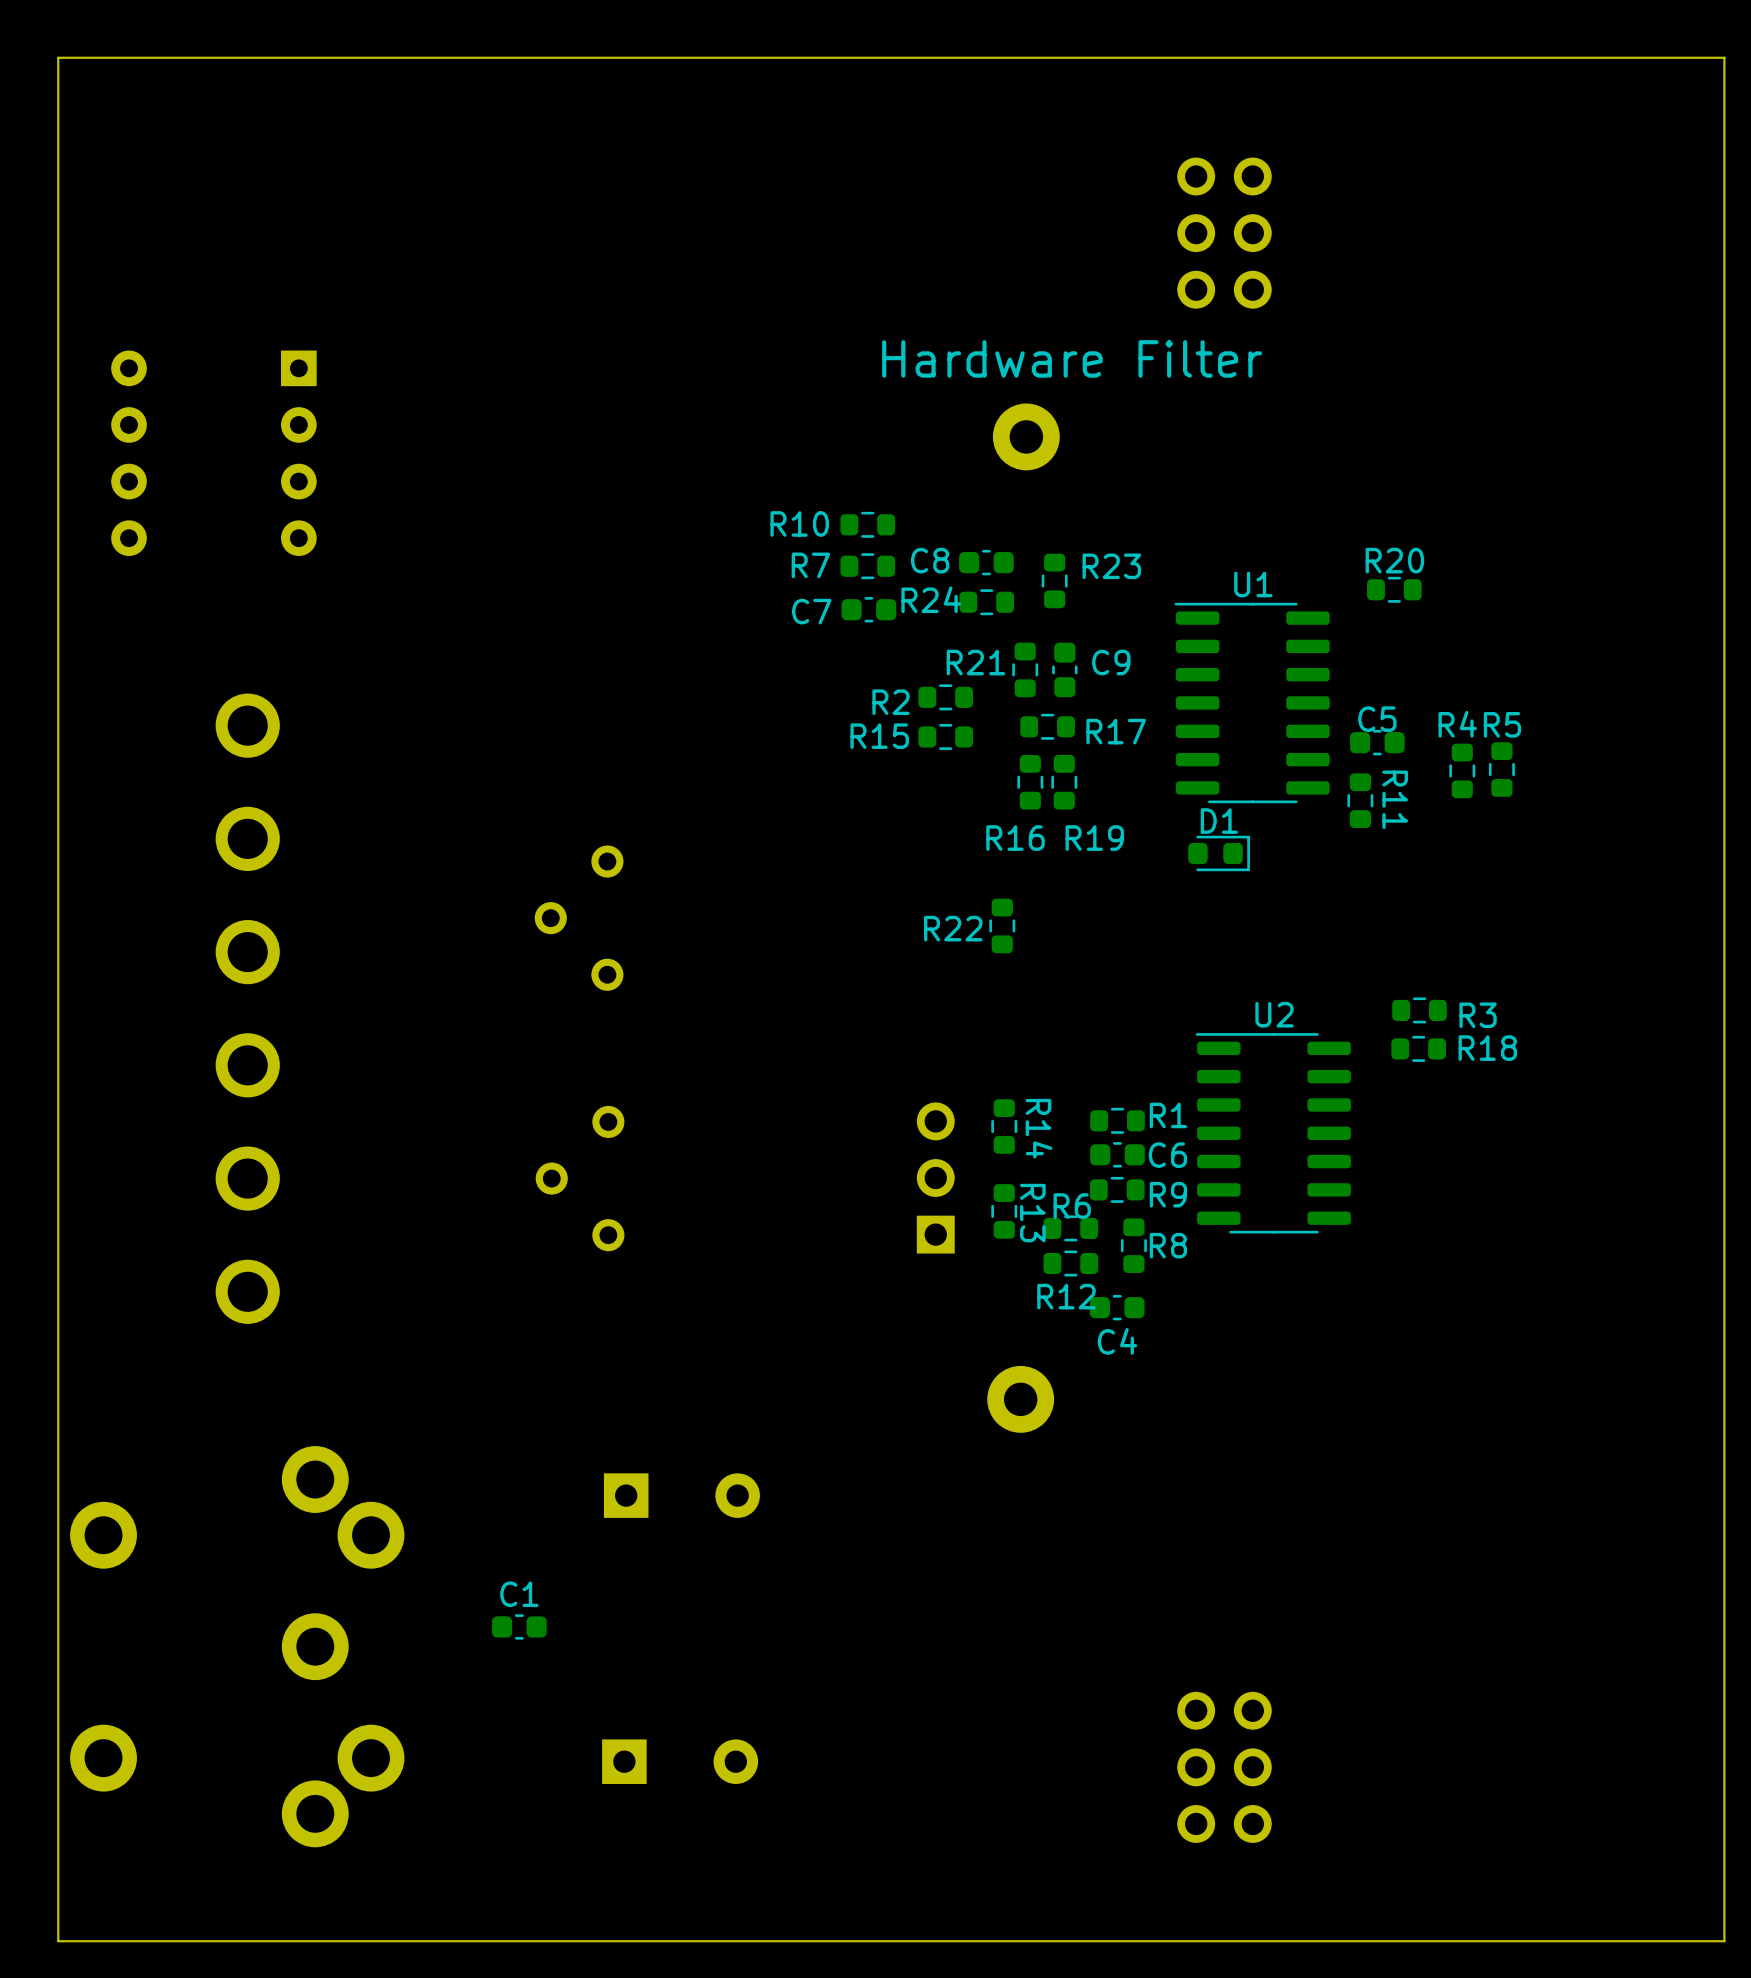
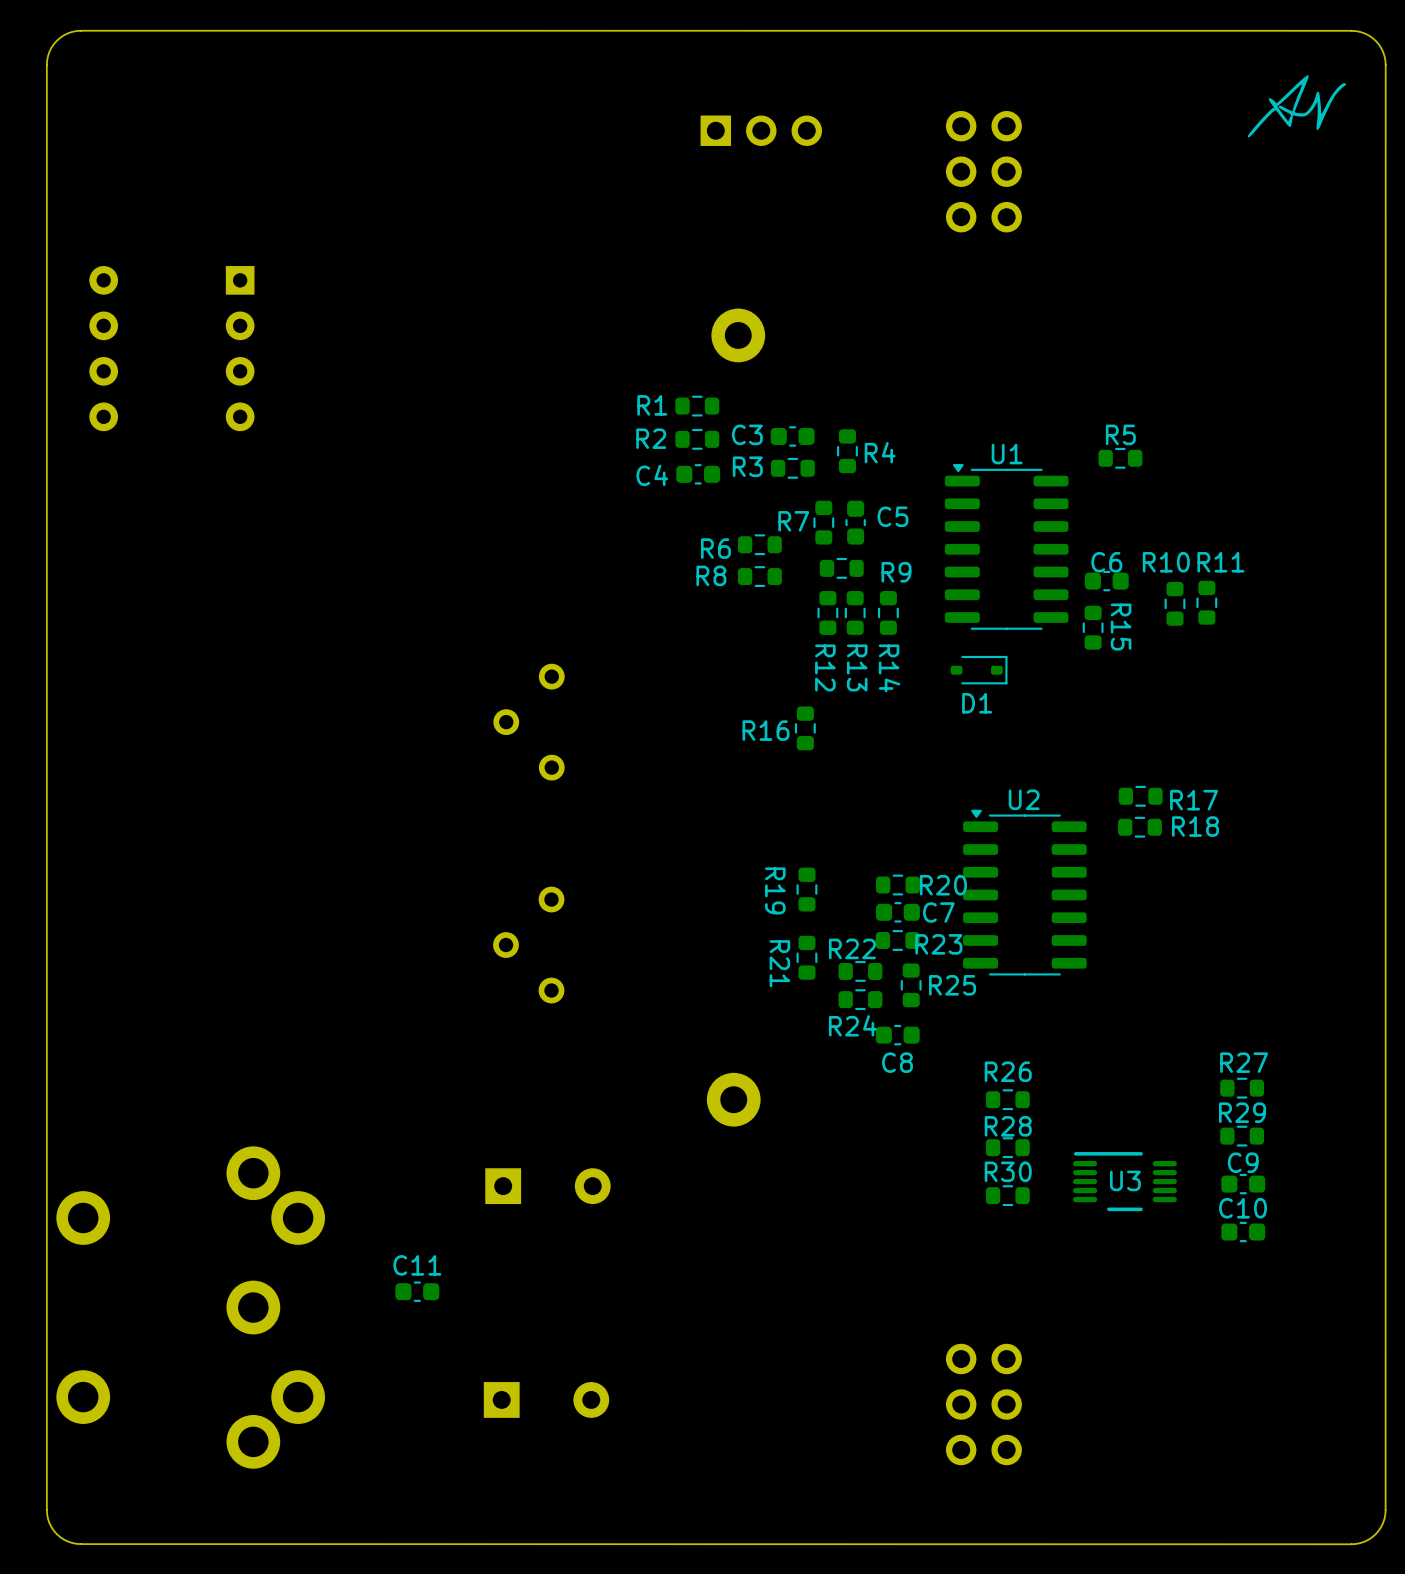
board edge: (58, 100) (58, 57) (1724, 57) (1724, 1941) (58, 1941) (58, 1898) -> (46, 64) (49, 51) (56, 40) (67, 33) (81, 30) (1351, 30) (1364, 33) (1375, 40) (1383, 51) (1385, 64) (1385, 1510) (1383, 1523) (1375, 1534) (1364, 1541) (1351, 1544) (80, 1544) (67, 1541) (56, 1534) (49, 1523) (46, 1510)
drawing: none -> [1247, 75, 1347, 138]
part: none -> (761, 130)
text: Hardware Filter (1072, 358) -> none
part position: (1026, 436) -> (738, 335)
R10 name: R10 (799, 523) -> R1 (652, 405)
C8 name: C8 (930, 560) -> C3 (747, 434)
R20 name: R20 (1394, 560) -> R5 (1120, 434)
R7 name: R7 (810, 565) -> R2 (651, 438)
R23 name: R23 (1111, 566) -> R4 (880, 452)
R24 name: R24 (931, 599) -> R3 (747, 466)
U1 footprint: [1174, 602, 1330, 804] -> [944, 464, 1069, 630]
C7 name: C7 (811, 611) -> C4 (652, 475)
R21 name: R21 (975, 662) -> R7 (793, 521)
C9 name: C9 (1111, 662) -> C5 (892, 516)
R2 name: R2 (891, 702) -> R6 (715, 548)
C5 name: C5 (1377, 719) -> C6 (1106, 562)
R4 name: R4 (1457, 724) -> R10 (1166, 562)
R5 name: R5 (1502, 724) -> R11 (1220, 562)
R17 name: R17 (1116, 731) -> R9 (896, 572)
R15 name: R15 (879, 736) -> R8 (711, 575)
R14: none -> (888, 612)
R11 name: R11 (1395, 799) -> R15 (1121, 627)
D1 name position: D1 (1219, 821) -> D1 (977, 703)
D1 footprint: [1188, 835, 1250, 872] -> [950, 655, 1008, 685]
R16 name: R16 (1015, 838) -> R12 (825, 667)
R19 name: R19 (1094, 838) -> R13 (857, 667)
part position: (579, 918) -> (529, 722)
R22 name: R22 (953, 928) -> R16 (766, 730)
part: (247, 1008) -> none
R3 name: R3 (1478, 1015) -> R17 (1194, 800)
U2 footprint: [1195, 1033, 1351, 1234] -> [963, 809, 1087, 976]
R1 name: R1 (1168, 1115) -> R20 (943, 885)
R14 name: R14 (1039, 1128) -> R19 (775, 890)
C6 name: C6 (1167, 1155) -> C7 (938, 912)
part position: (580, 1178) -> (528, 945)
part: (935, 1178) -> none
R9 name: R9 (1168, 1194) -> R23 (938, 944)
R6 name: R6 (1072, 1206) -> R22 (852, 948)
R13 name: R13 (1032, 1213) -> R21 (779, 963)
R8 name: R8 (1168, 1245) -> R25 (952, 985)
R12 name: R12 (1066, 1296) -> R24 (852, 1025)
C4 name: C4 (1117, 1341) -> C8 (897, 1062)
R27: none -> (1242, 1088)
R26: none -> (1007, 1099)
part position: (1020, 1399) -> (733, 1099)
R29: none -> (1242, 1136)
R28: none -> (1007, 1147)
U3: none -> (1124, 1181)
C9: none -> (1243, 1184)
R30: none -> (1007, 1195)
C10: none -> (1243, 1232)
C1 name: C1 (519, 1594) -> C11 (417, 1265)

